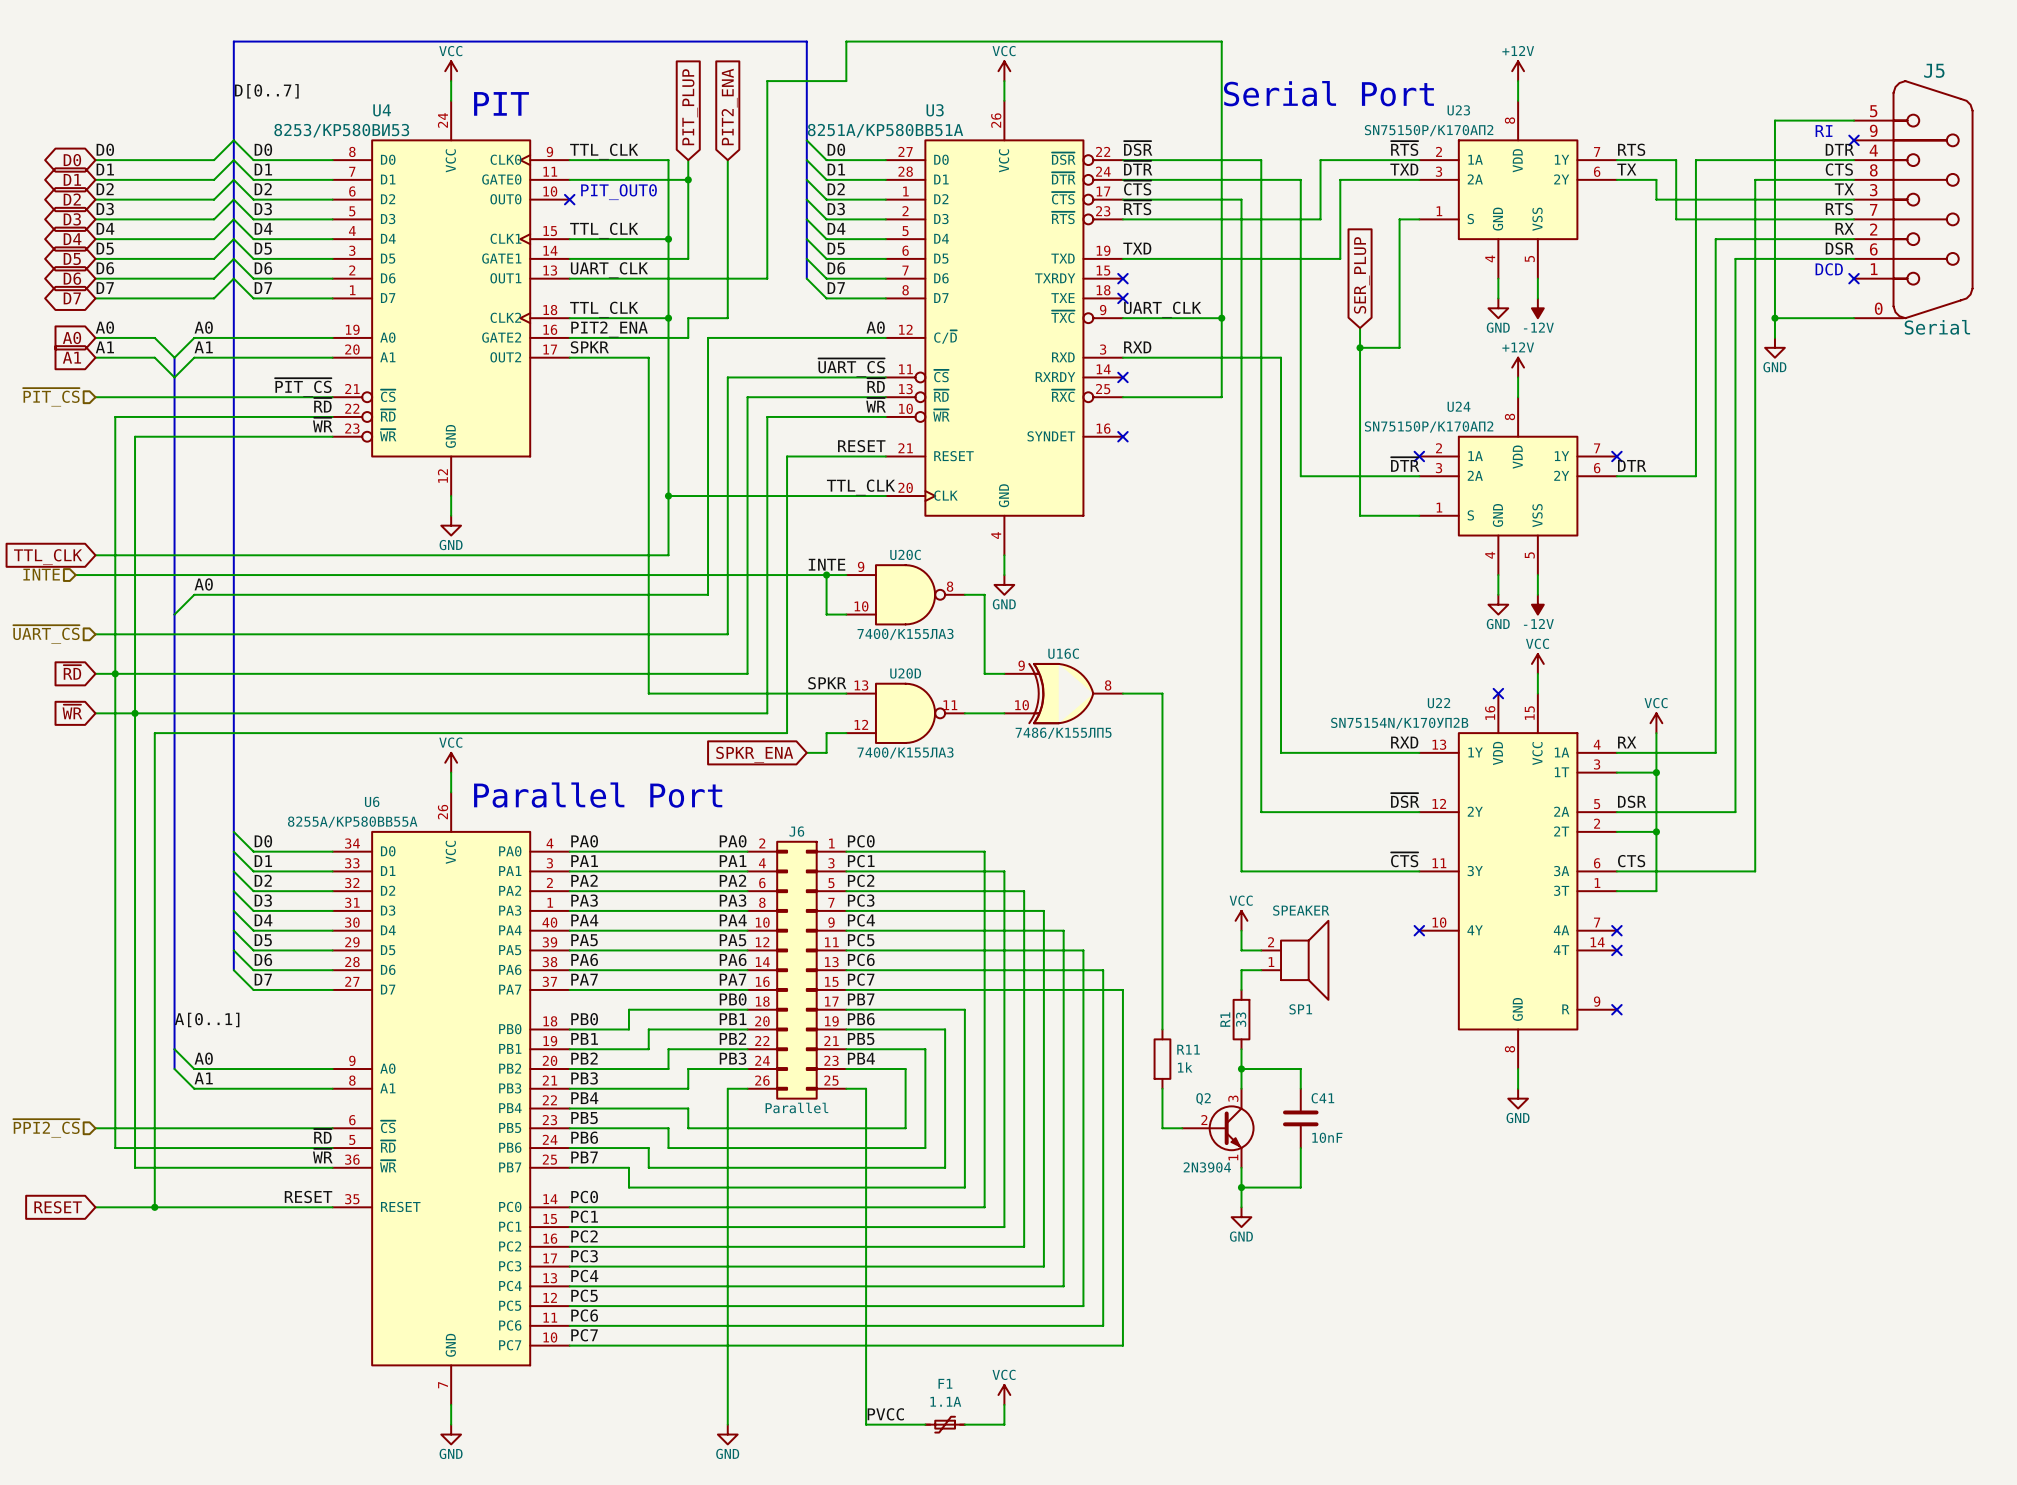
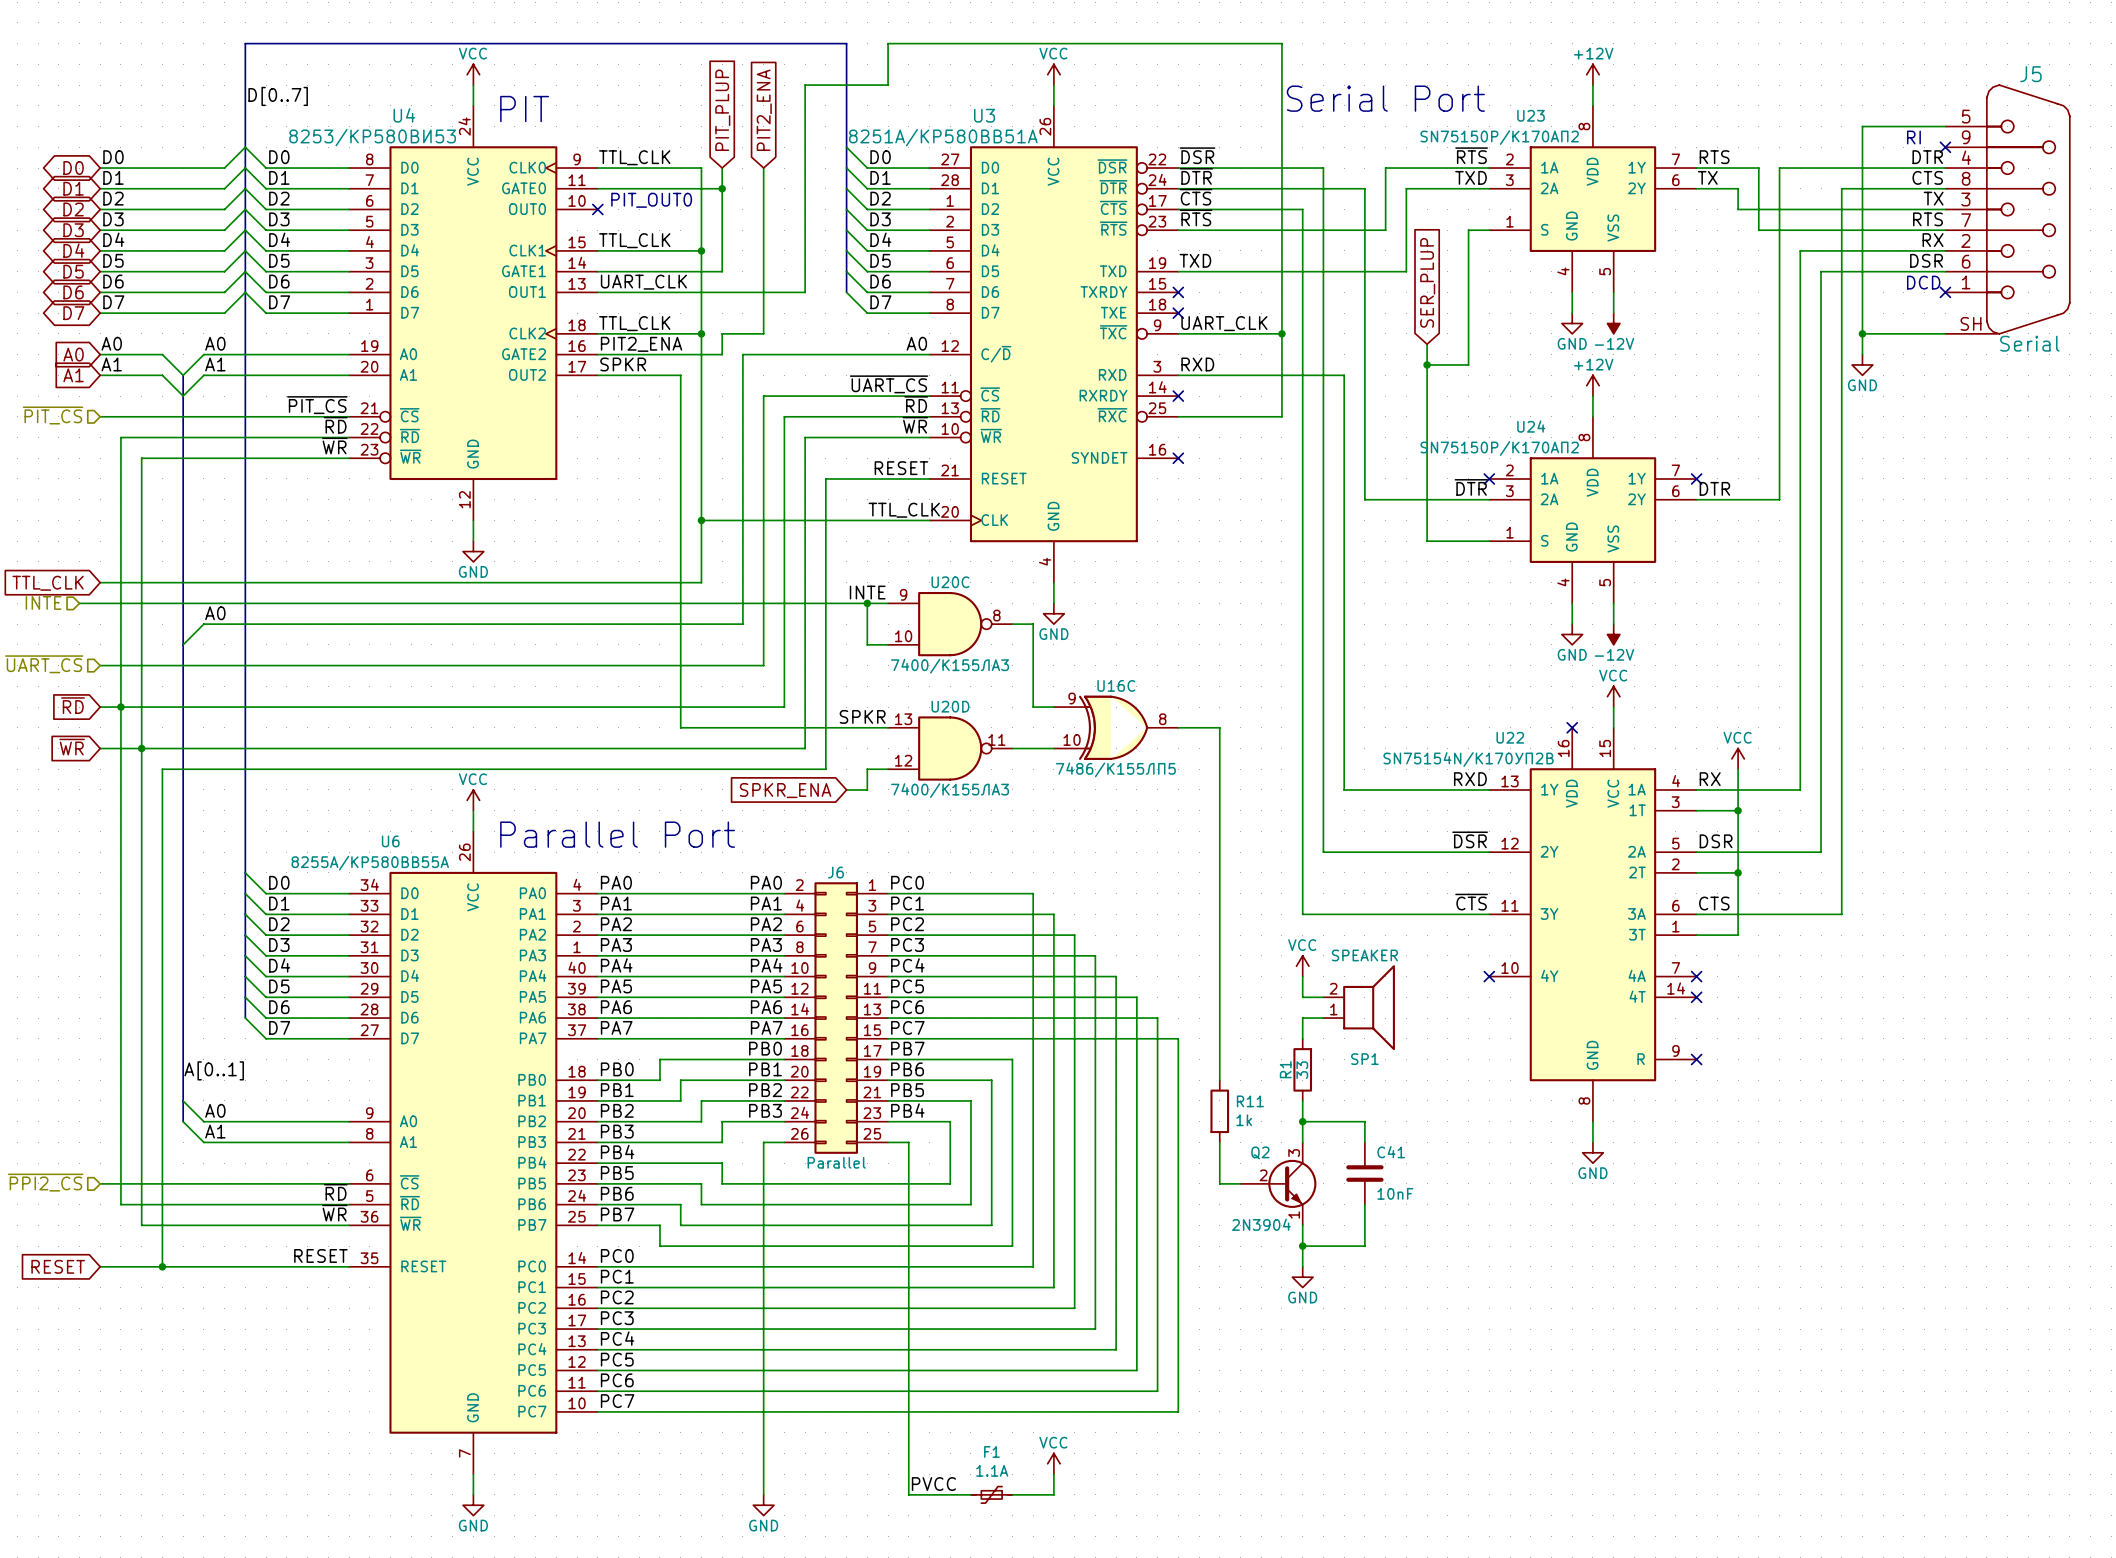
J5 pin number: 0 (1878, 308) -> SH (1971, 323)

